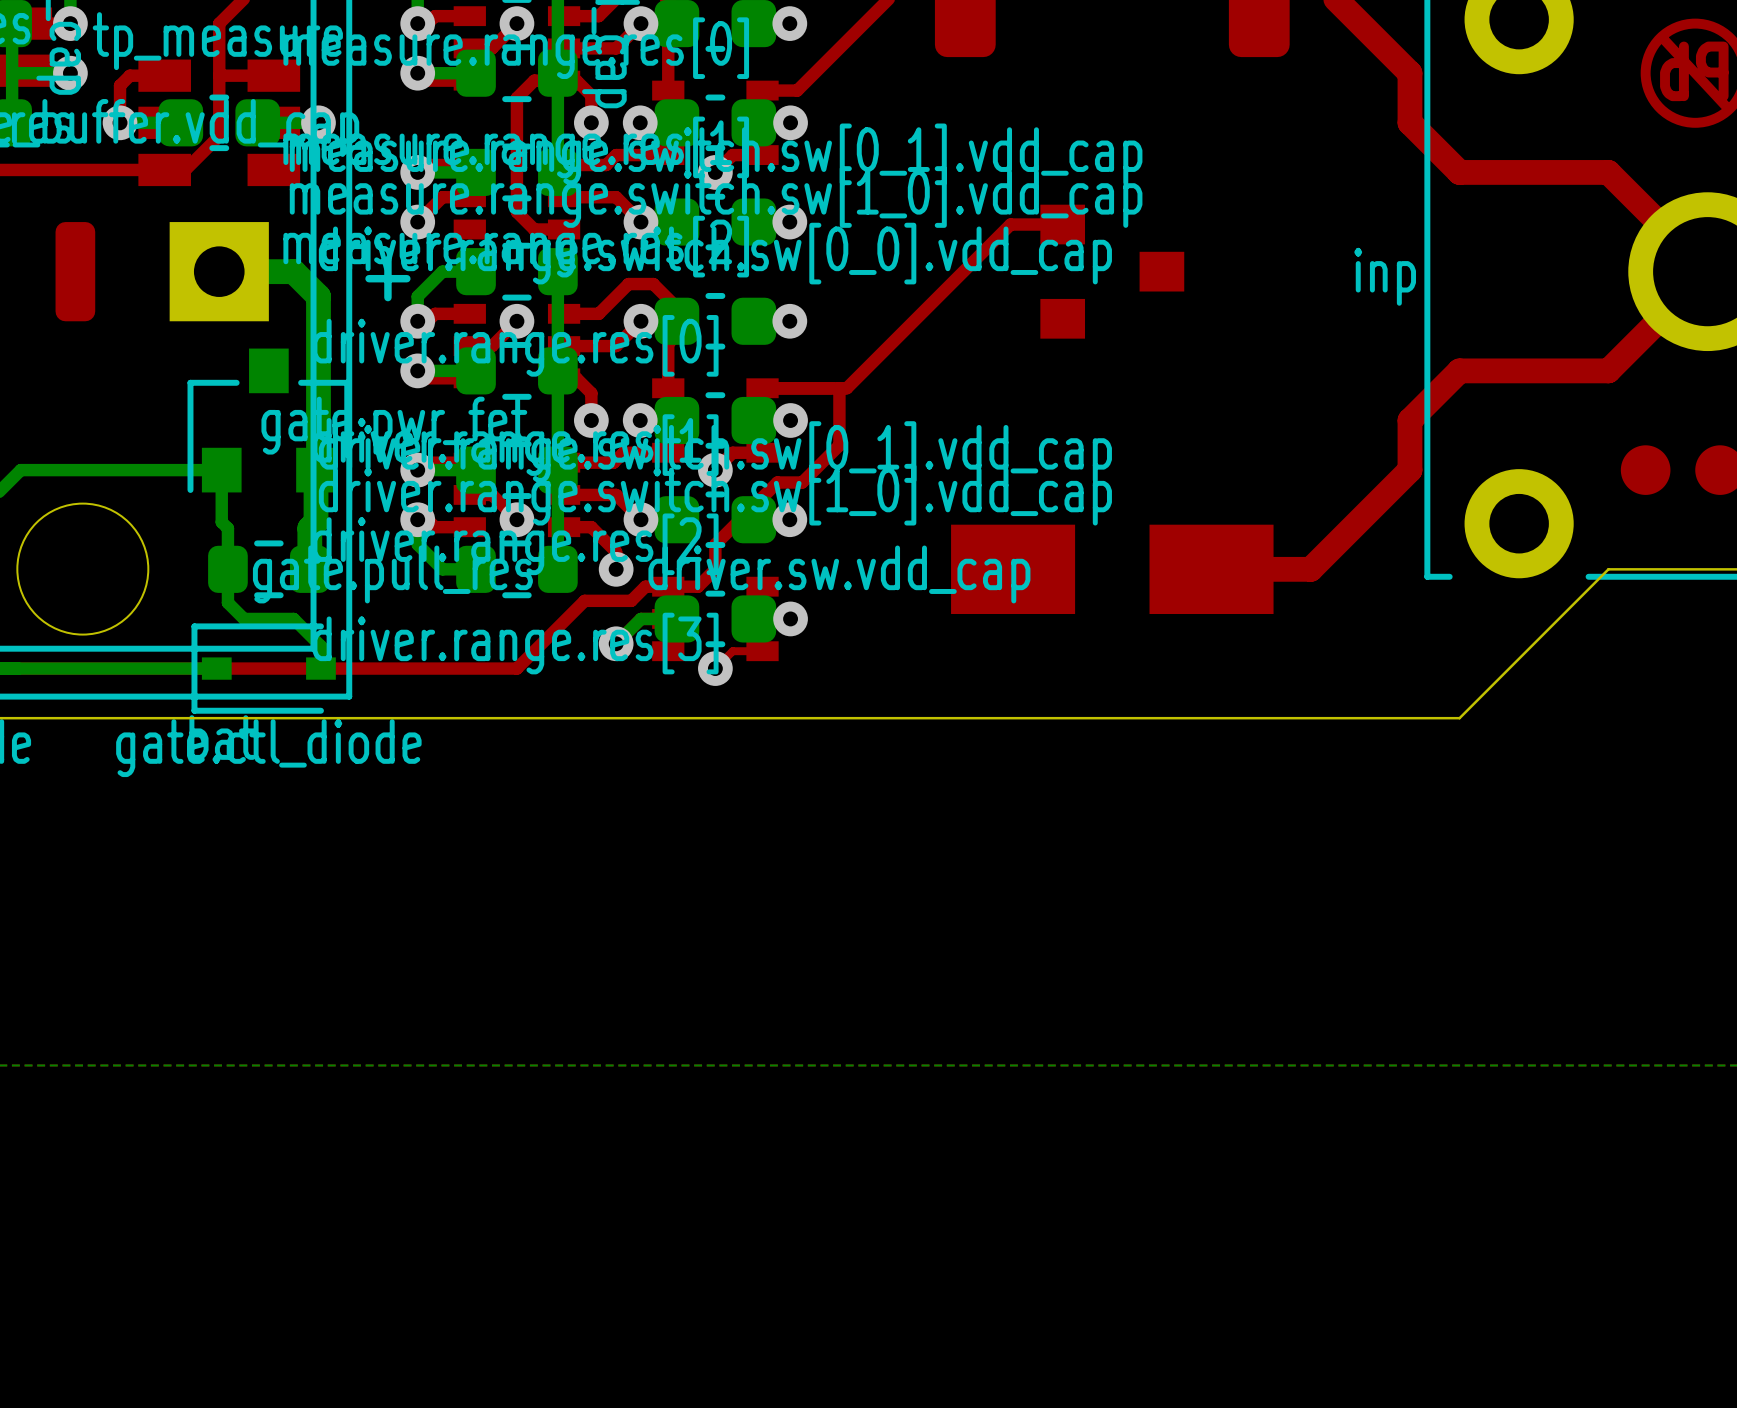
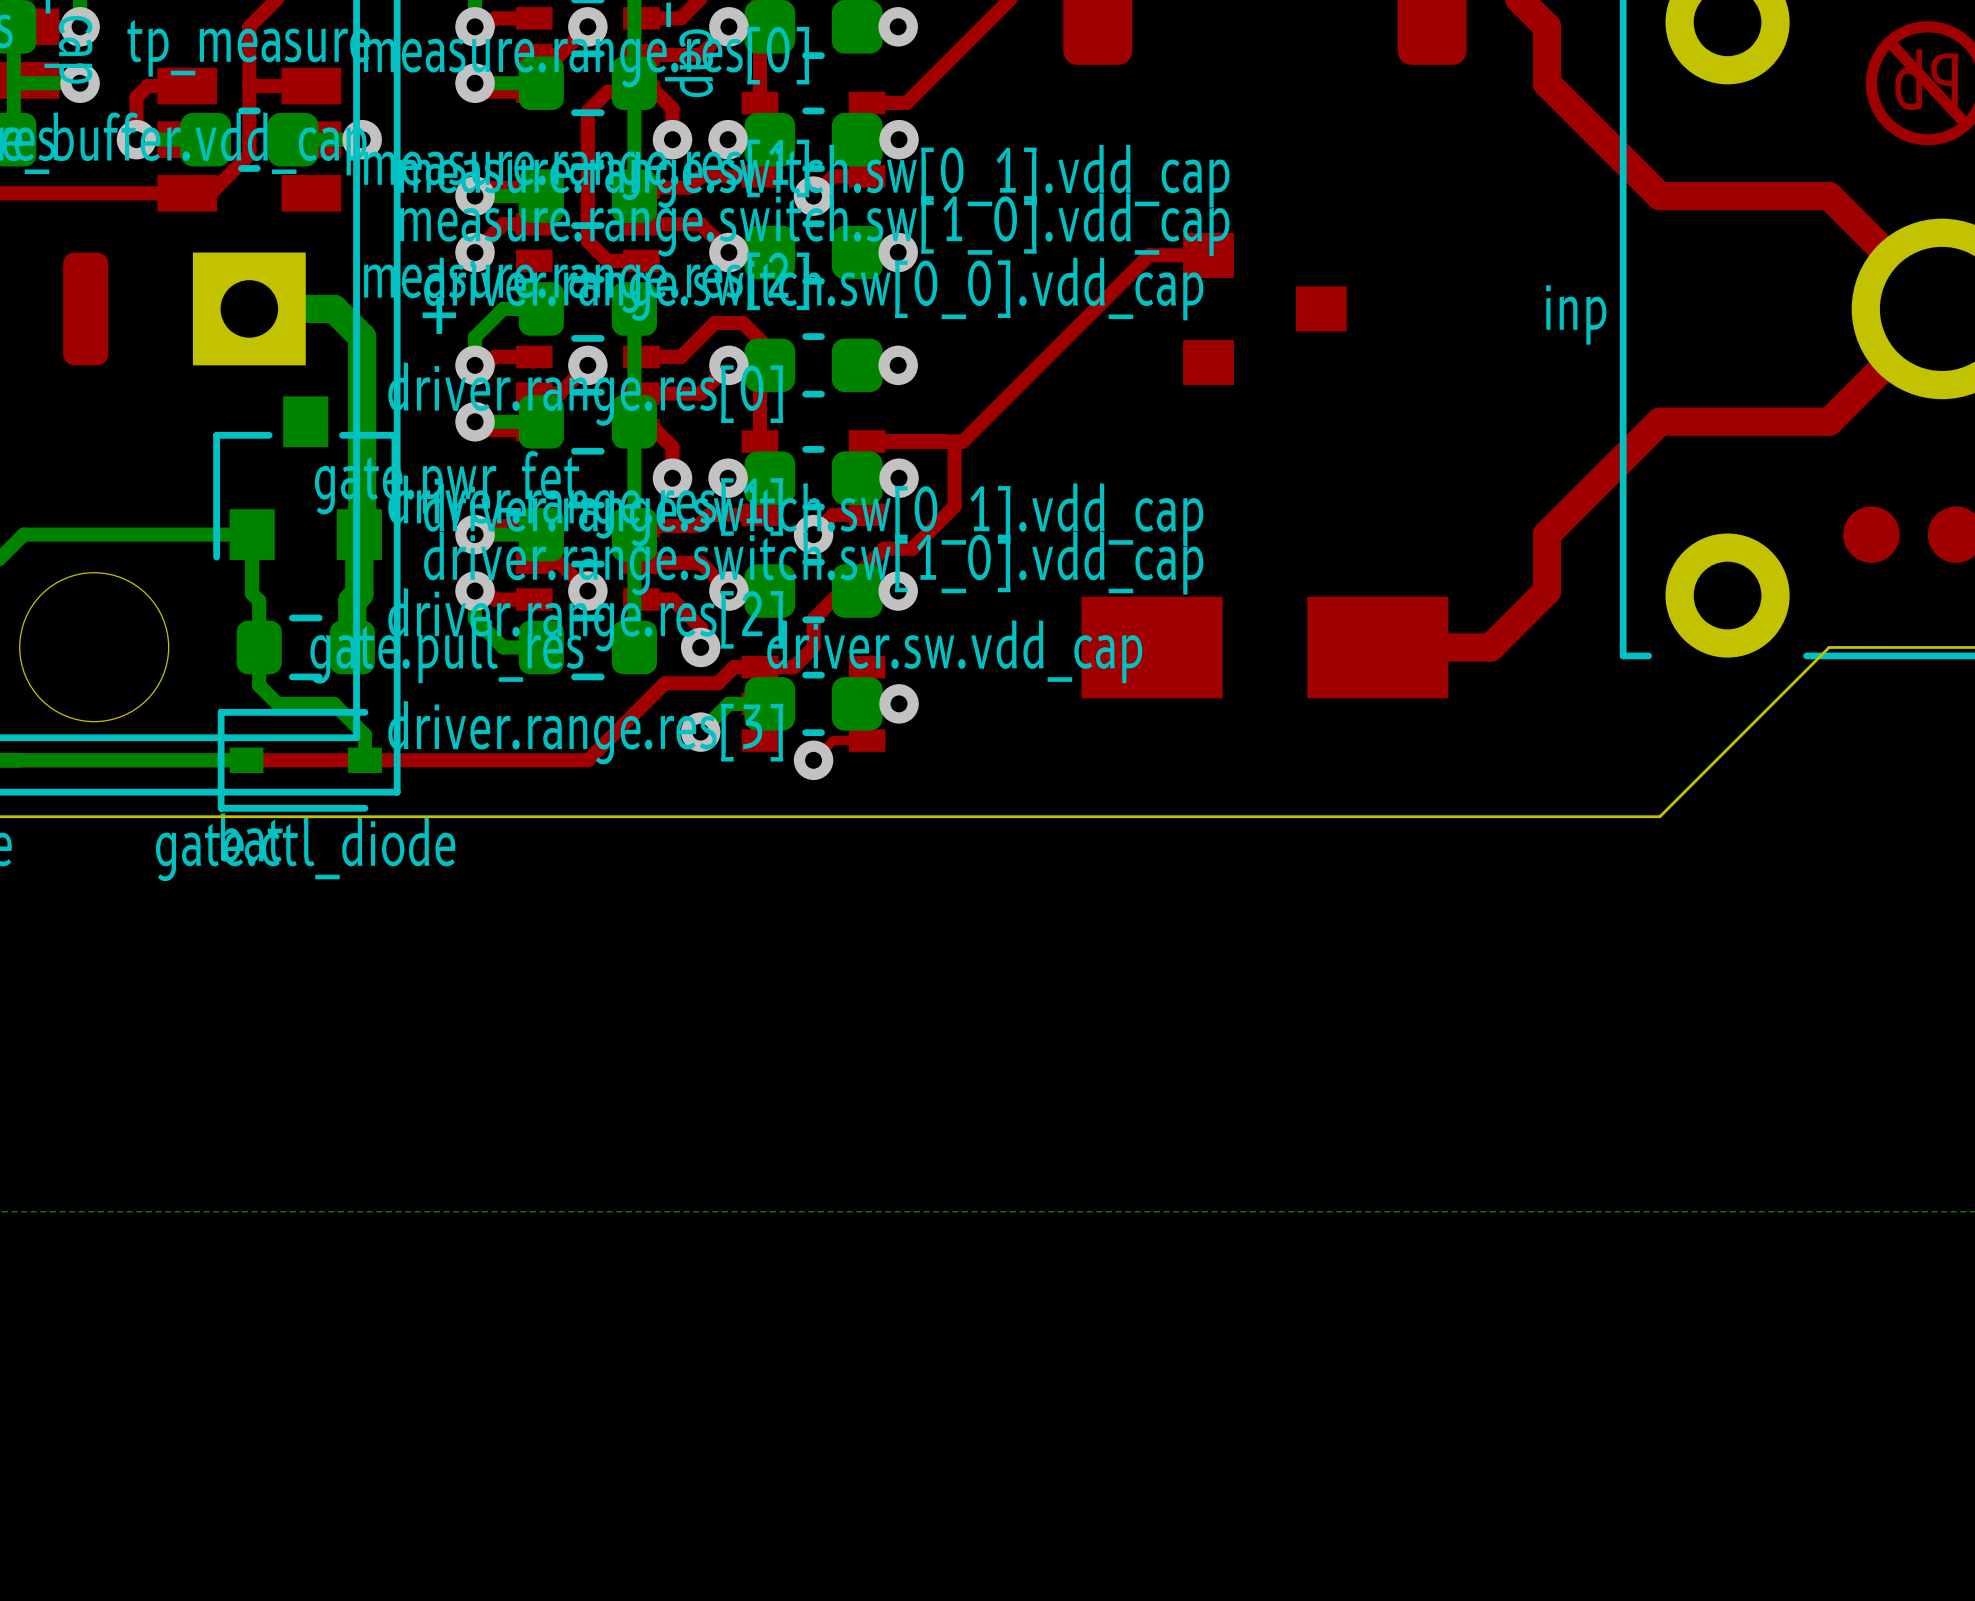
top track: (1360, 23) (1409, 73) (1409, 122) -> (1547, 26) (1547, 83) (1603, 139)
top track: (1409, 420) (1409, 470) (1360, 519) -> (1603, 478) (1547, 534) (1547, 591)

